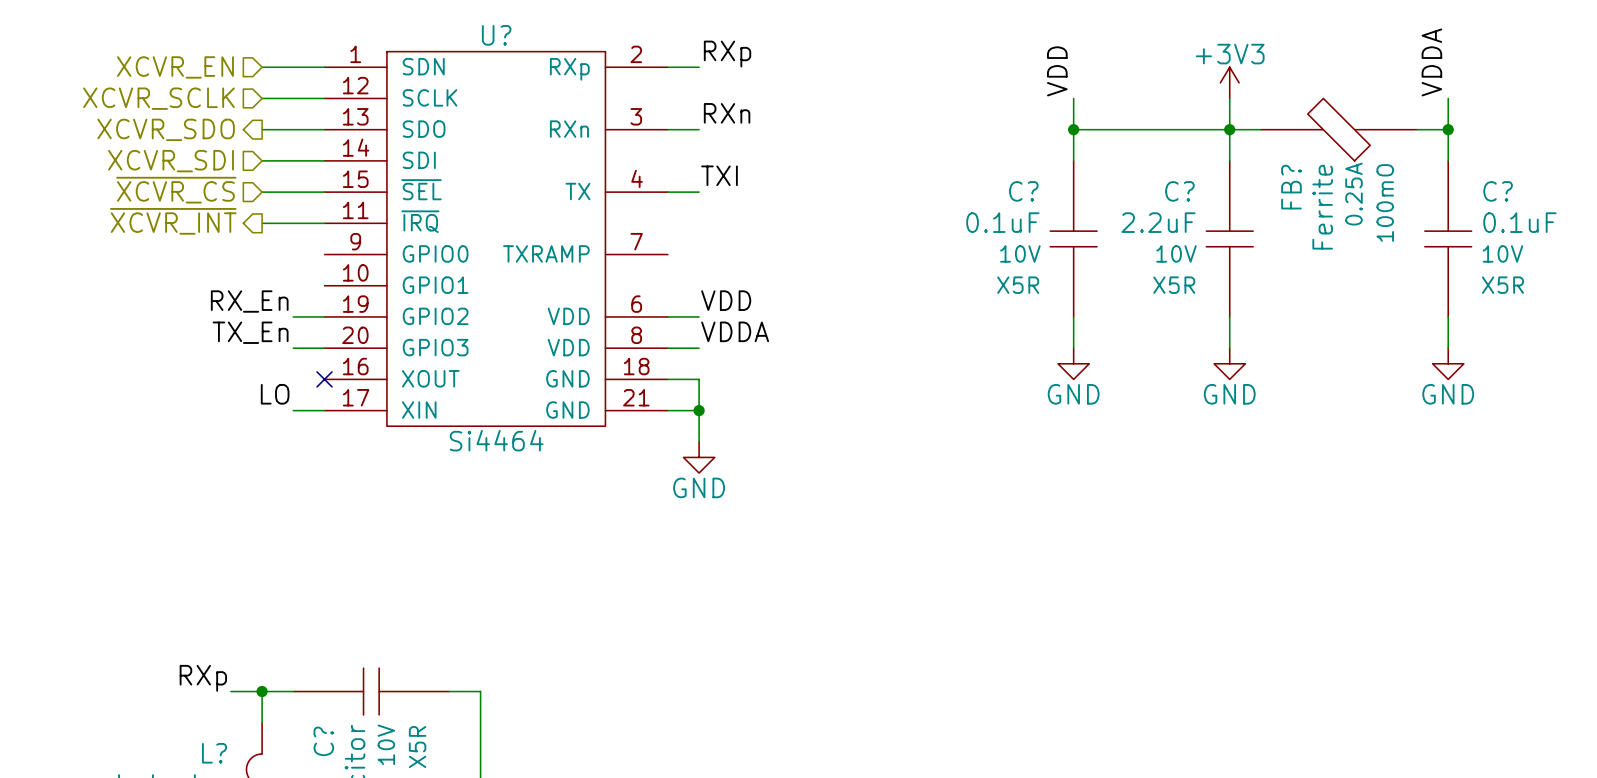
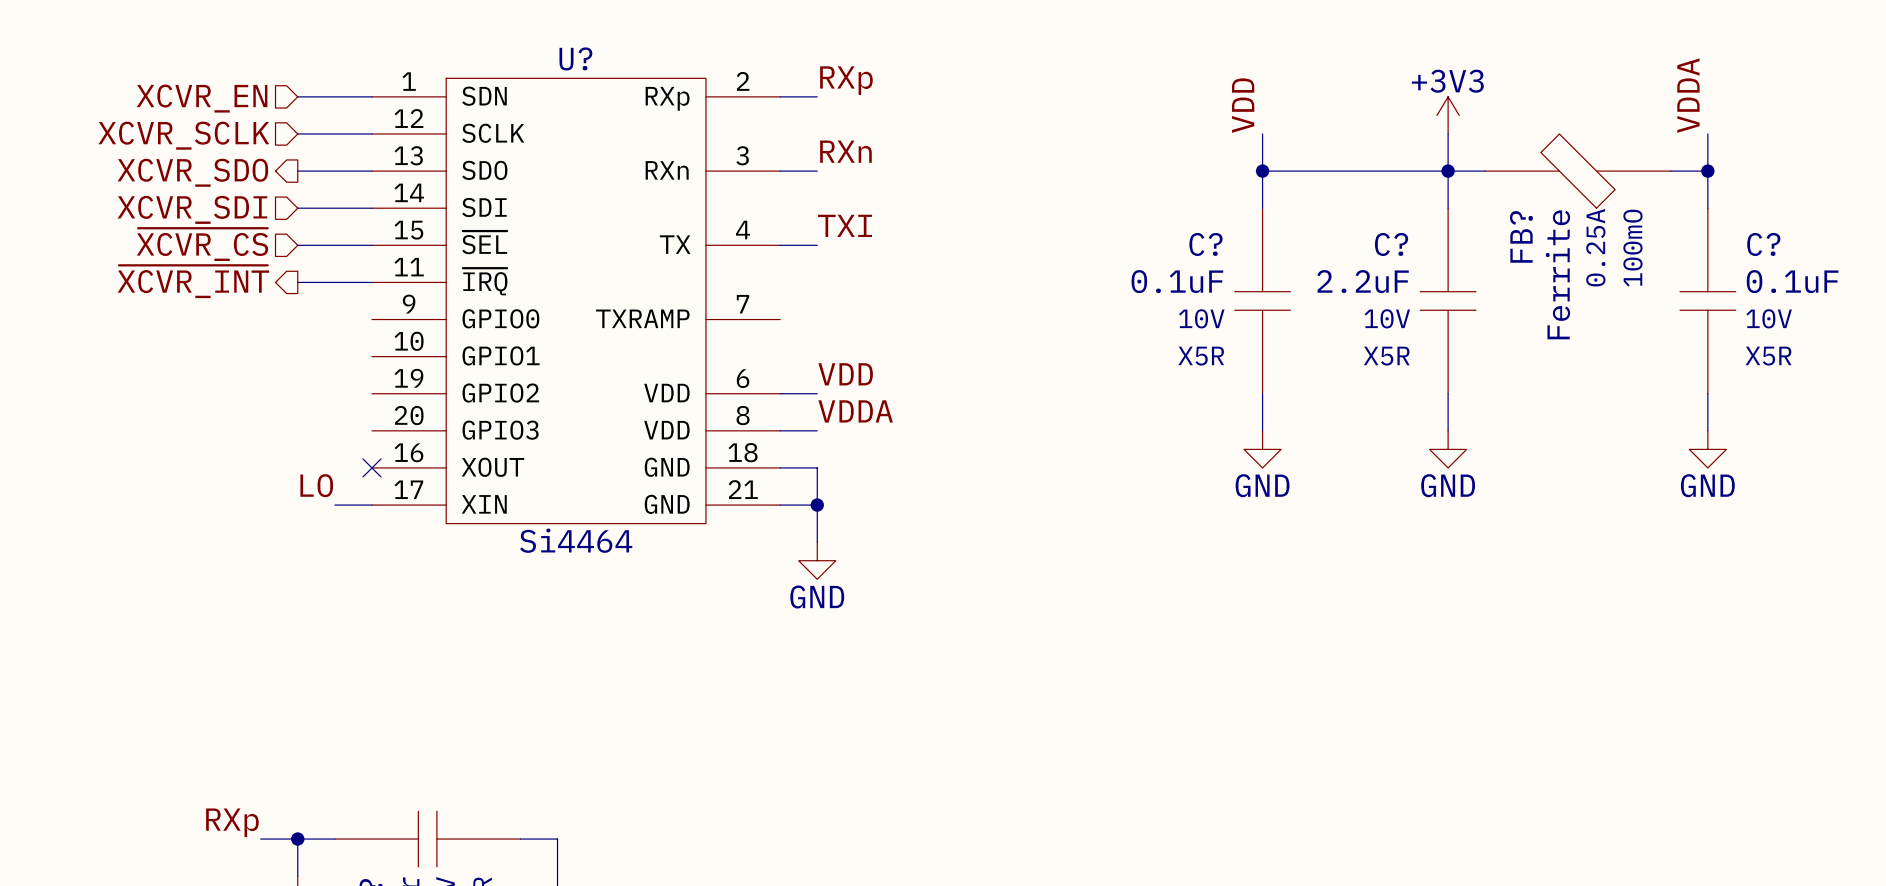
label: RX_En (249, 301) -> none
wire: (293, 316) (324, 316) -> none
label: TX_En (250, 332) -> none
wire: (293, 348) (324, 348) -> none

